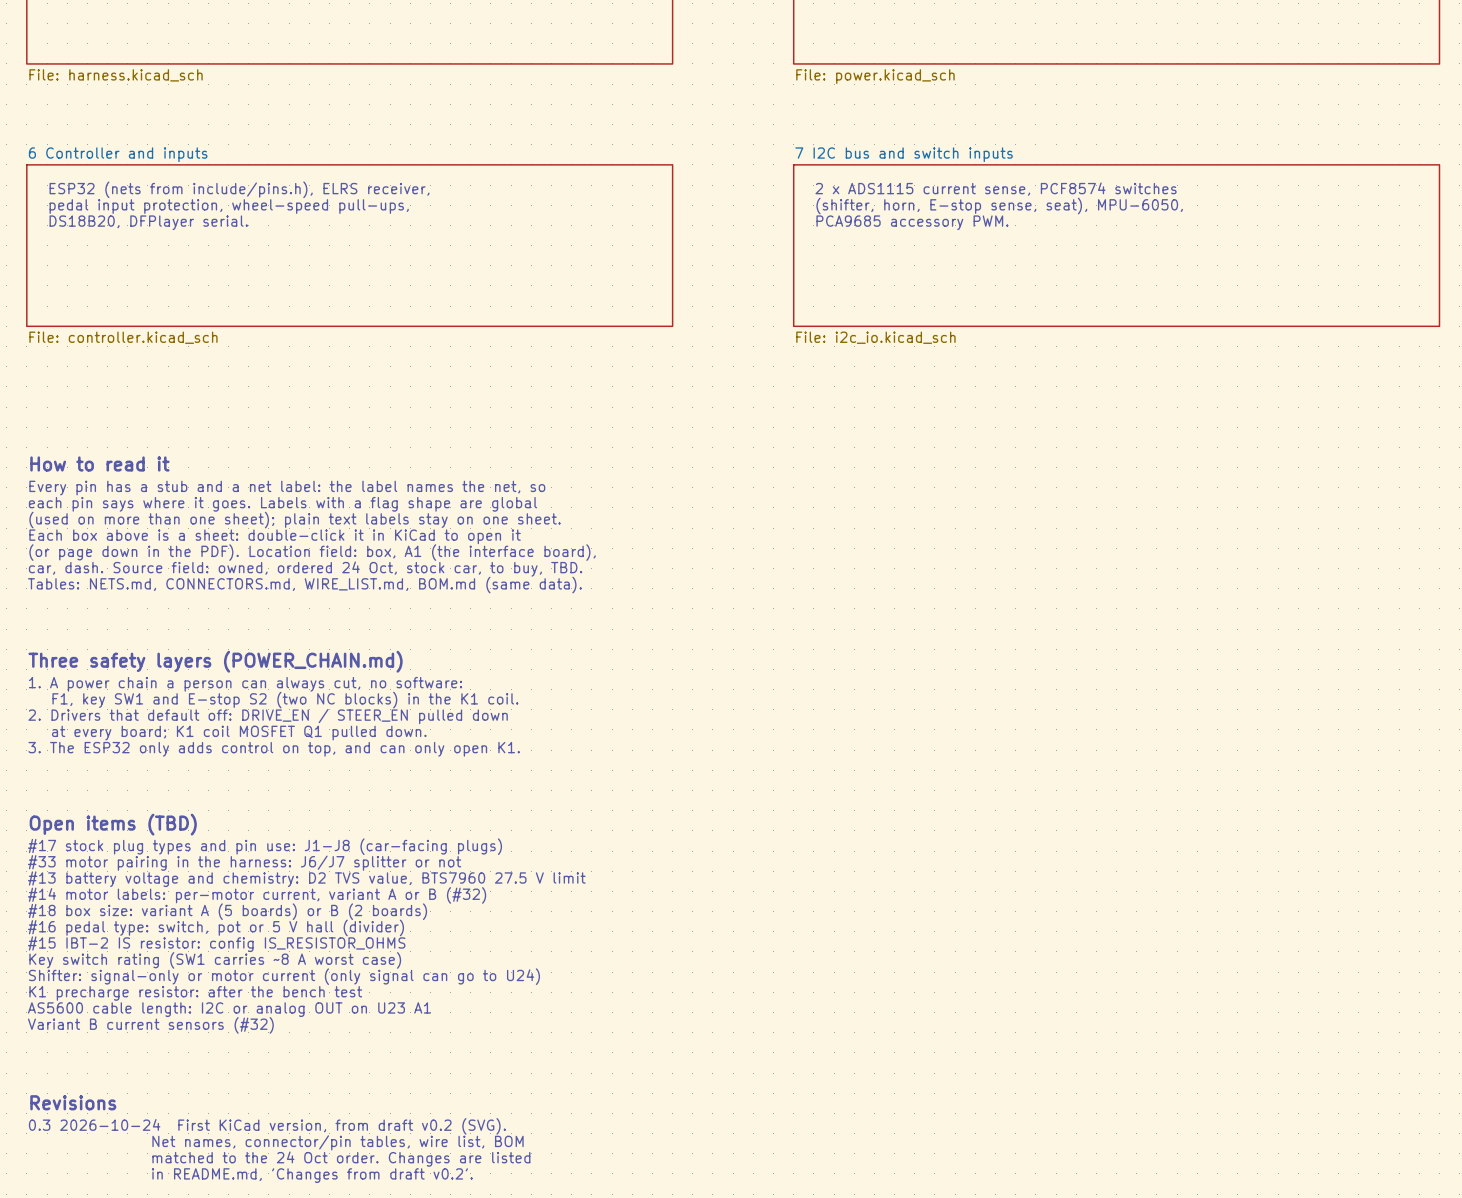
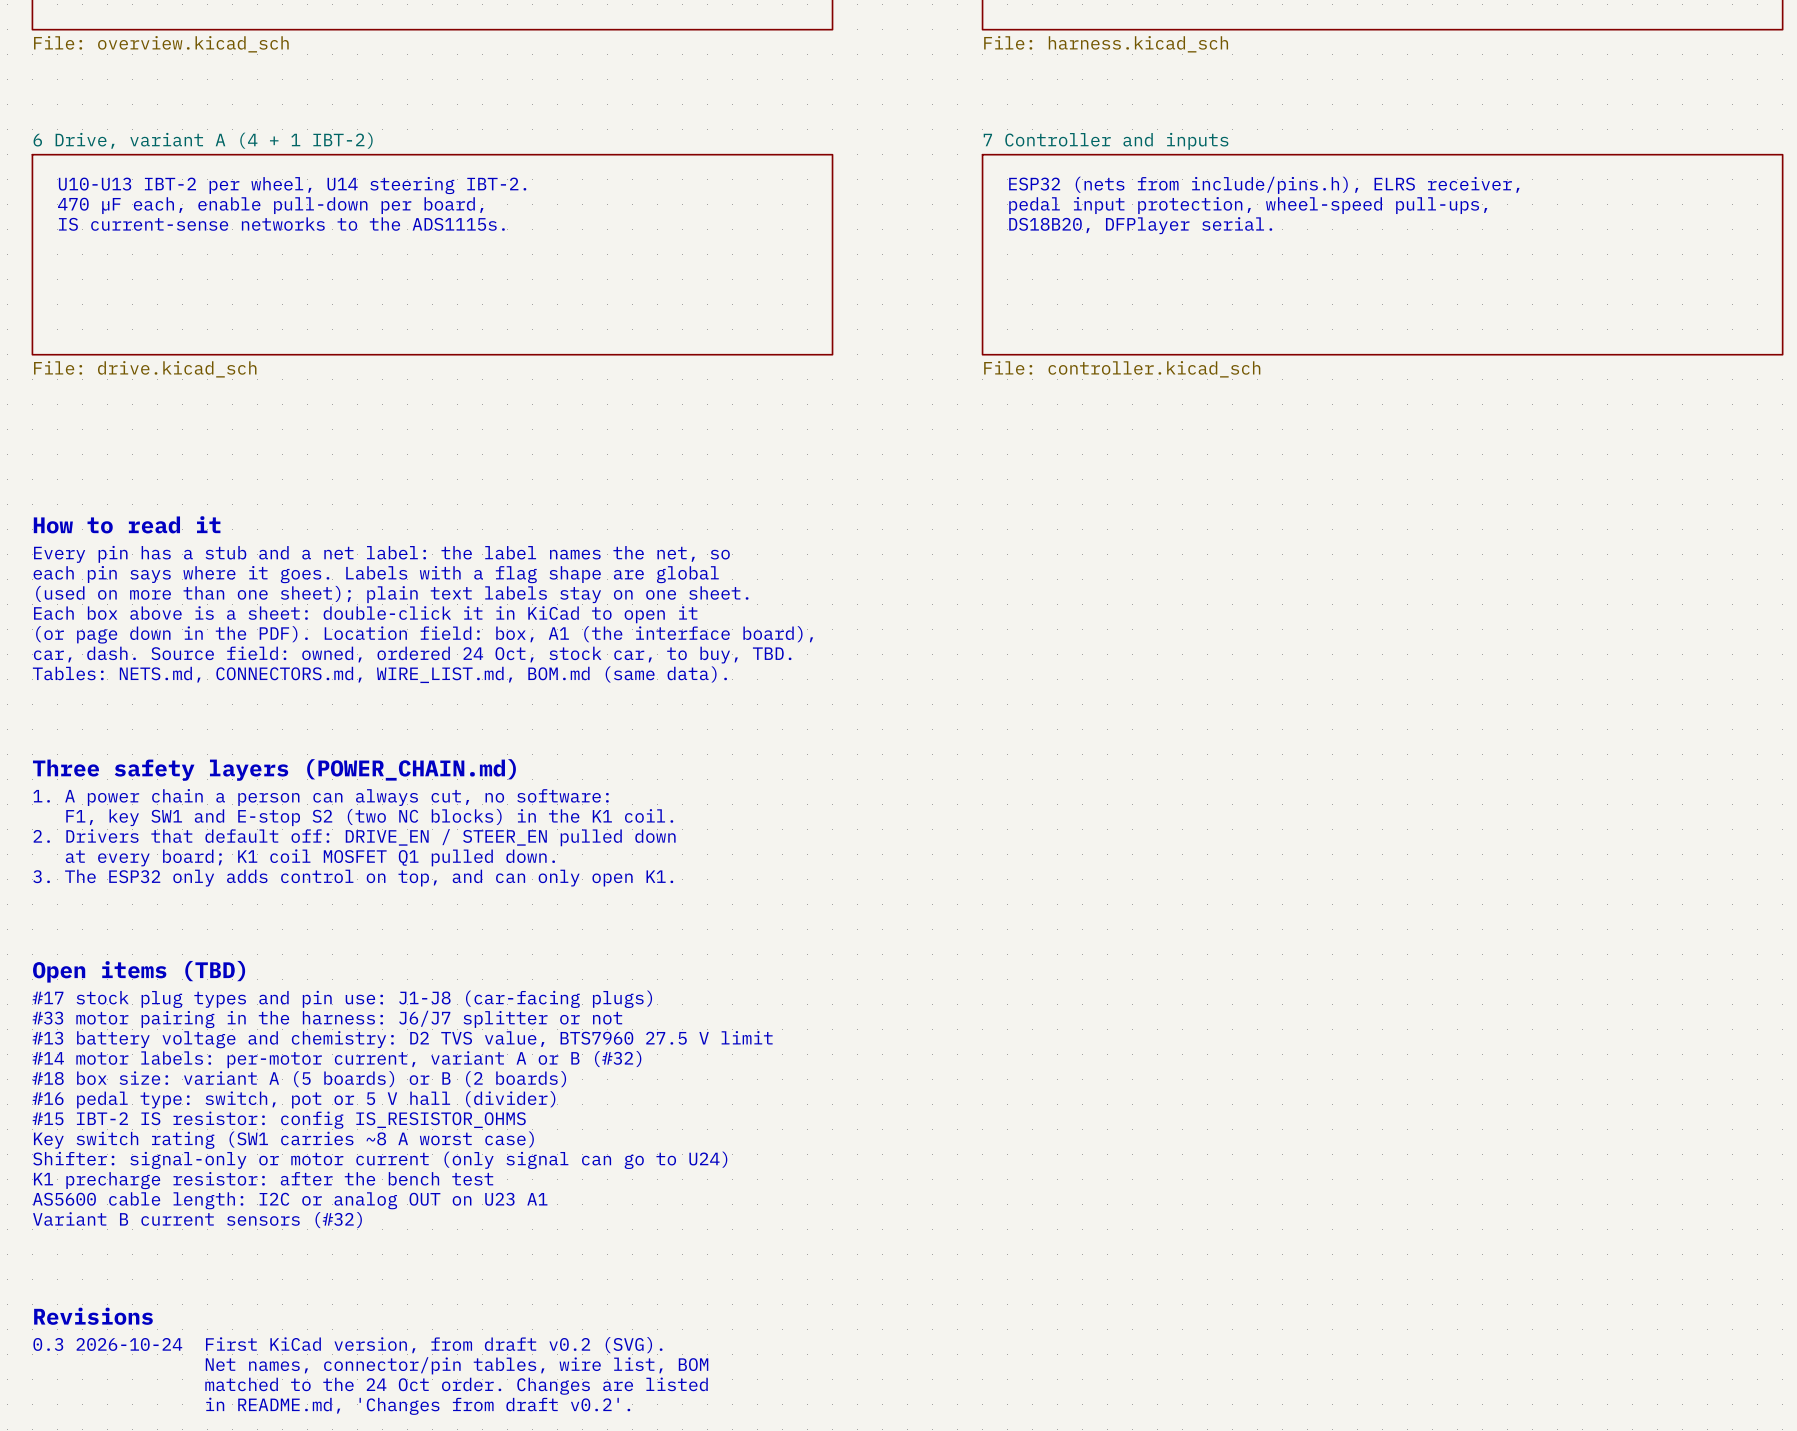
sheet value: File: harness.kicad_sch (116, 75) -> File: overview.kicad_sch (161, 44)
sheet value: File: power.kicad_sch (875, 76) -> File: harness.kicad_sch (1106, 44)
sheet 6 Controller and inputs name: 6 Controller and inputs (118, 154) -> 6 Drive, variant A (4 + 1 IBT-2) (203, 140)
sheet 7 I2C bus and switch inputs name: 7 I2C bus and switch inputs (904, 154) -> 7 Controller and inputs (1106, 141)
text: ESP32 (nets from include/pins.h), ELRS receiver, (239, 189) -> U10-U13 IBT-2 per wheel, U14 steering IBT-2. (292, 185)
text: 2 x ADS1115 current sense, PCF8574 switches (996, 189) -> ESP32 (nets from include/pins.h), ELRS receiver, (1264, 185)
text: pedal input protection, wheel-speed pull-ups, (229, 206) -> 470 µF each, enable pull-down per board, (270, 205)
text: (shifter, horn, E-stop sense, seat), MPU-6050, (999, 206) -> pedal input protection, wheel-speed pull-ups, (1248, 205)
text: DS18B20, DFPlayer serial. (148, 222) -> IS current-sense networks to the ADS1115s. (281, 224)
text: PCA9685 accessory PWM. (912, 222) -> DS18B20, DFPlayer serial. (1140, 225)
sheet 6 Controller and inputs value: File: controller.kicad_sch (123, 337) -> File: drive.kicad_sch (145, 369)
sheet 7 I2C bus and switch inputs value: File: i2c_io.kicad_sch (875, 337) -> File: controller.kicad_sch (1122, 369)

